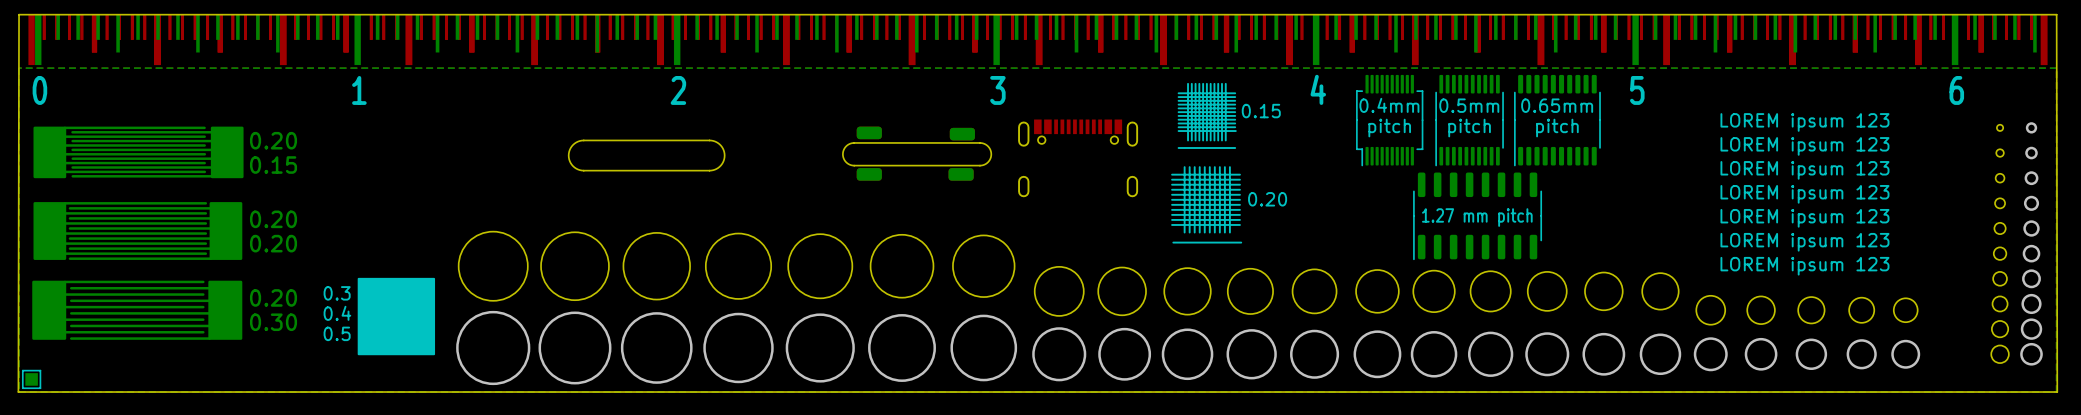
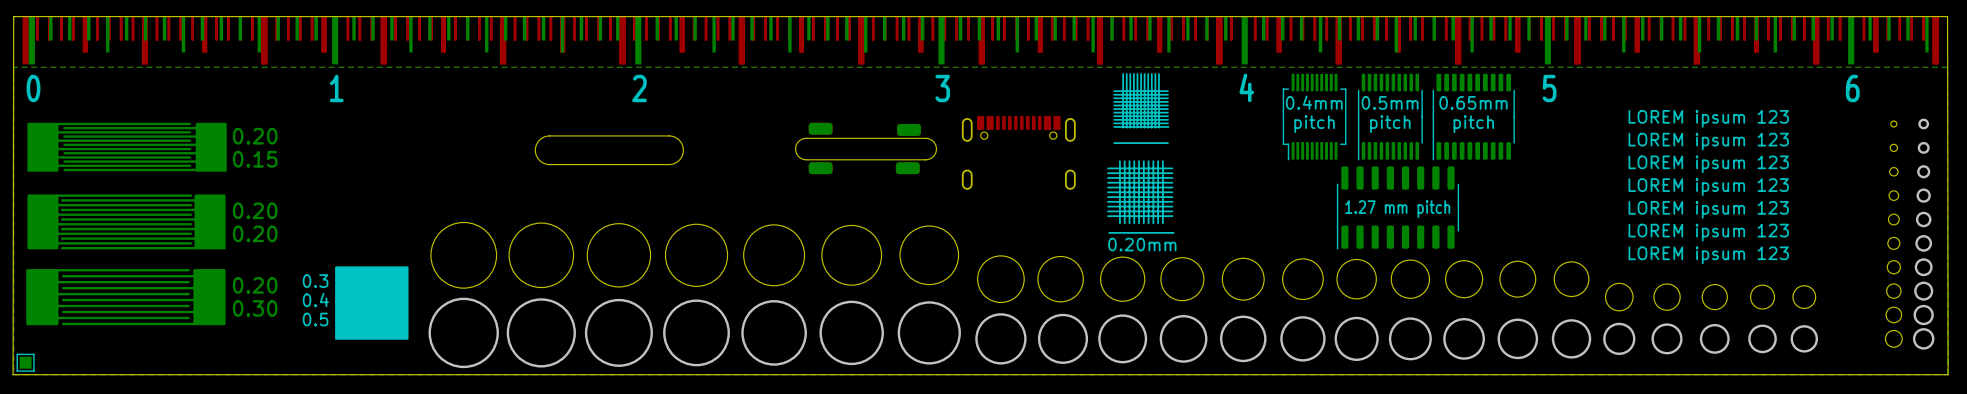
text: 0.15 (1261, 111) -> none
line: (1188, 131) (1188, 140) -> (1123, 74) (1123, 82)
line: (1191, 131) (1191, 140) -> (1126, 74) (1126, 82)
line: (1195, 131) (1195, 140) -> (1130, 74) (1130, 82)
line: (1199, 131) (1199, 140) -> (1133, 74) (1133, 82)
line: (1203, 131) (1203, 140) -> (1137, 74) (1137, 82)
line: (1206, 131) (1206, 140) -> (1141, 74) (1141, 82)
line: (1210, 131) (1210, 140) -> (1144, 74) (1144, 82)
line: (1214, 131) (1214, 140) -> (1148, 74) (1148, 82)
line: (1218, 131) (1218, 140) -> (1151, 74) (1151, 82)
line: (1221, 131) (1221, 140) -> (1155, 74) (1155, 82)
line: (1225, 131) (1225, 140) -> (1158, 74) (1158, 82)
text: 0.20 (1267, 199) -> none
text: none -> 0.20mm (1142, 244)

